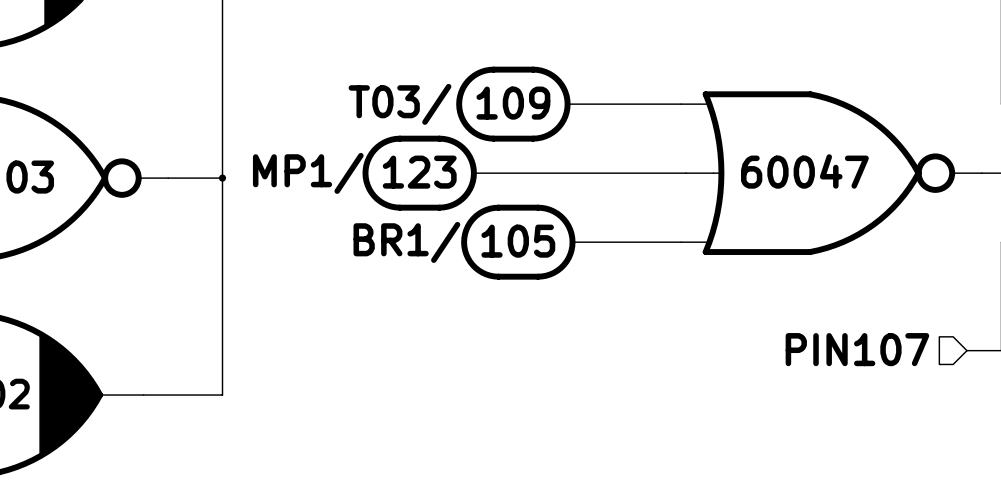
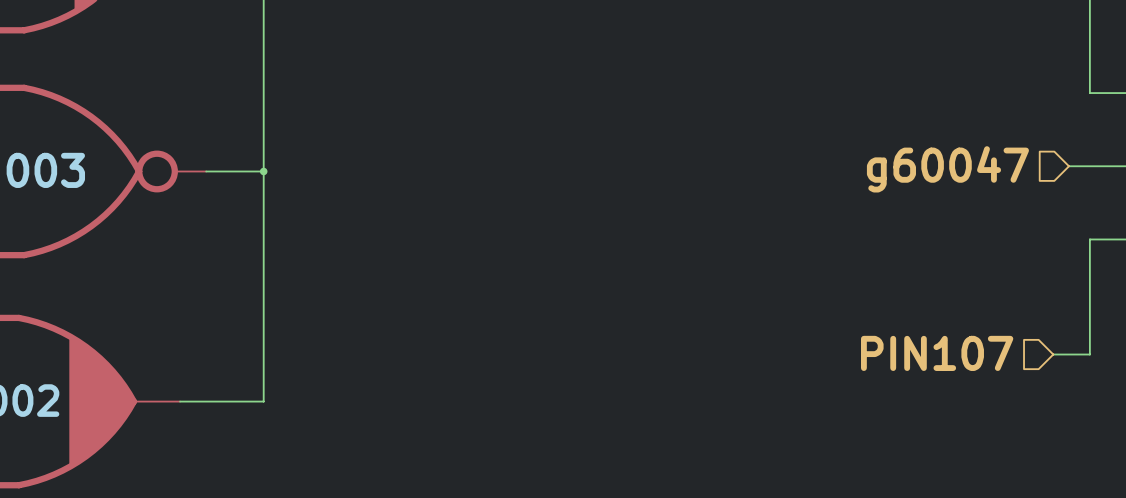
part: (513, 104) -> none
wire: (567, 104) (681, 104) -> none
part: (419, 173) -> none
wire: (473, 173) (685, 173) -> none
part: (831, 173) -> none
hierarchical label: none -> g60047 (947, 169)
part: (518, 242) -> none
wire: (572, 242) (681, 242) -> none

